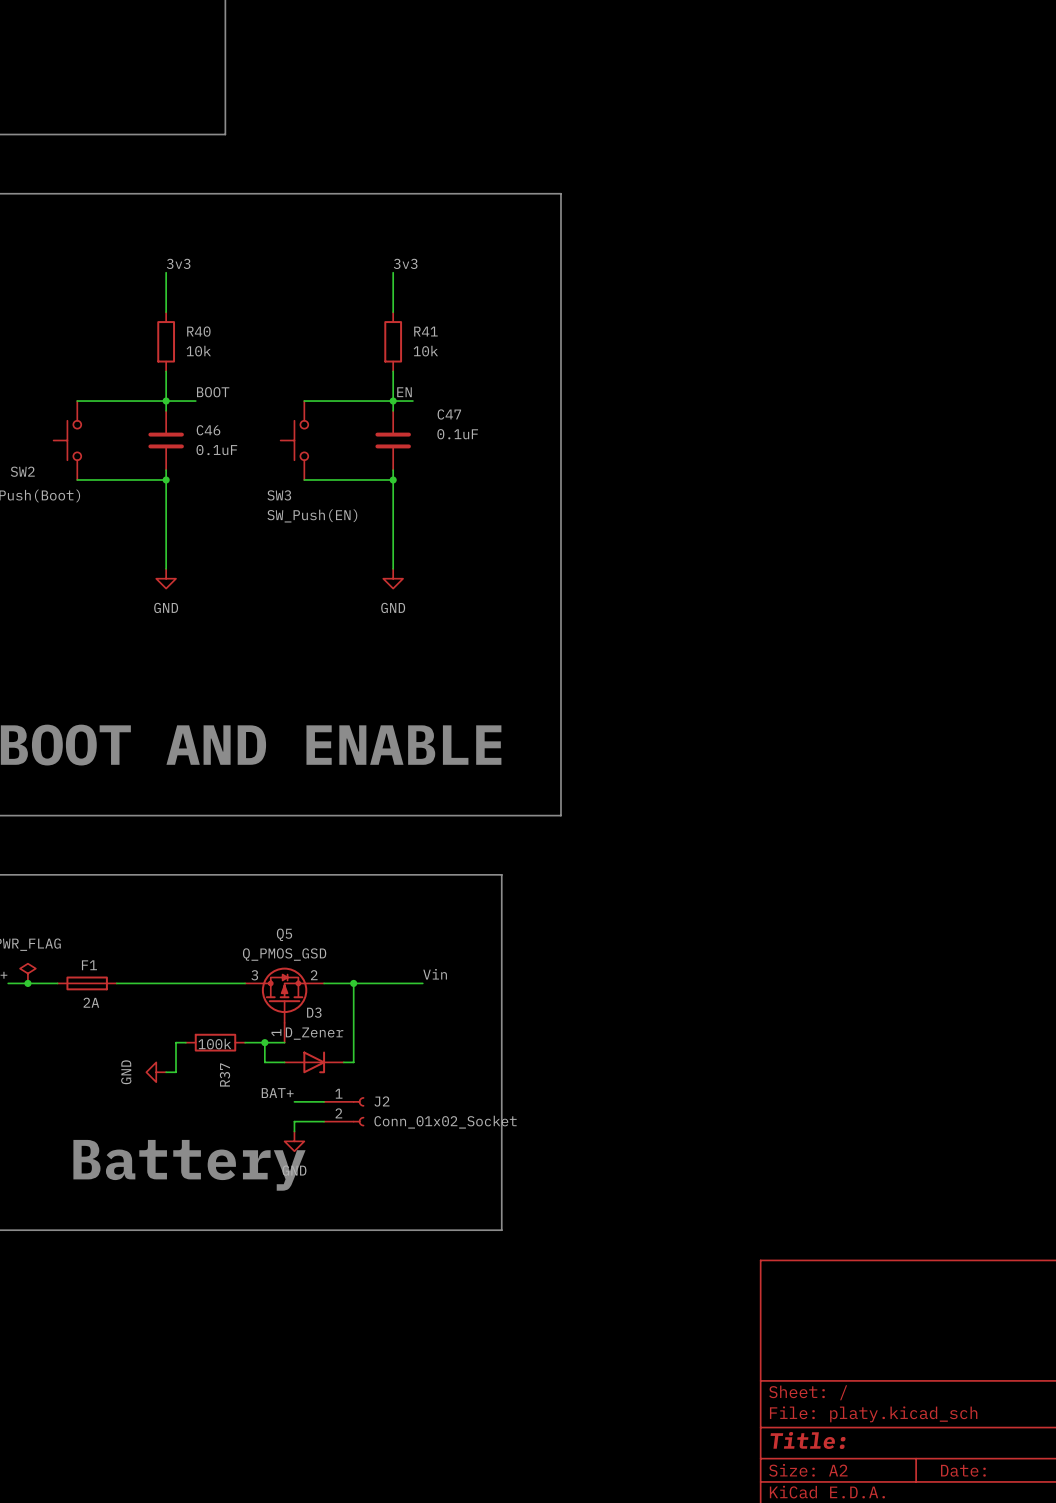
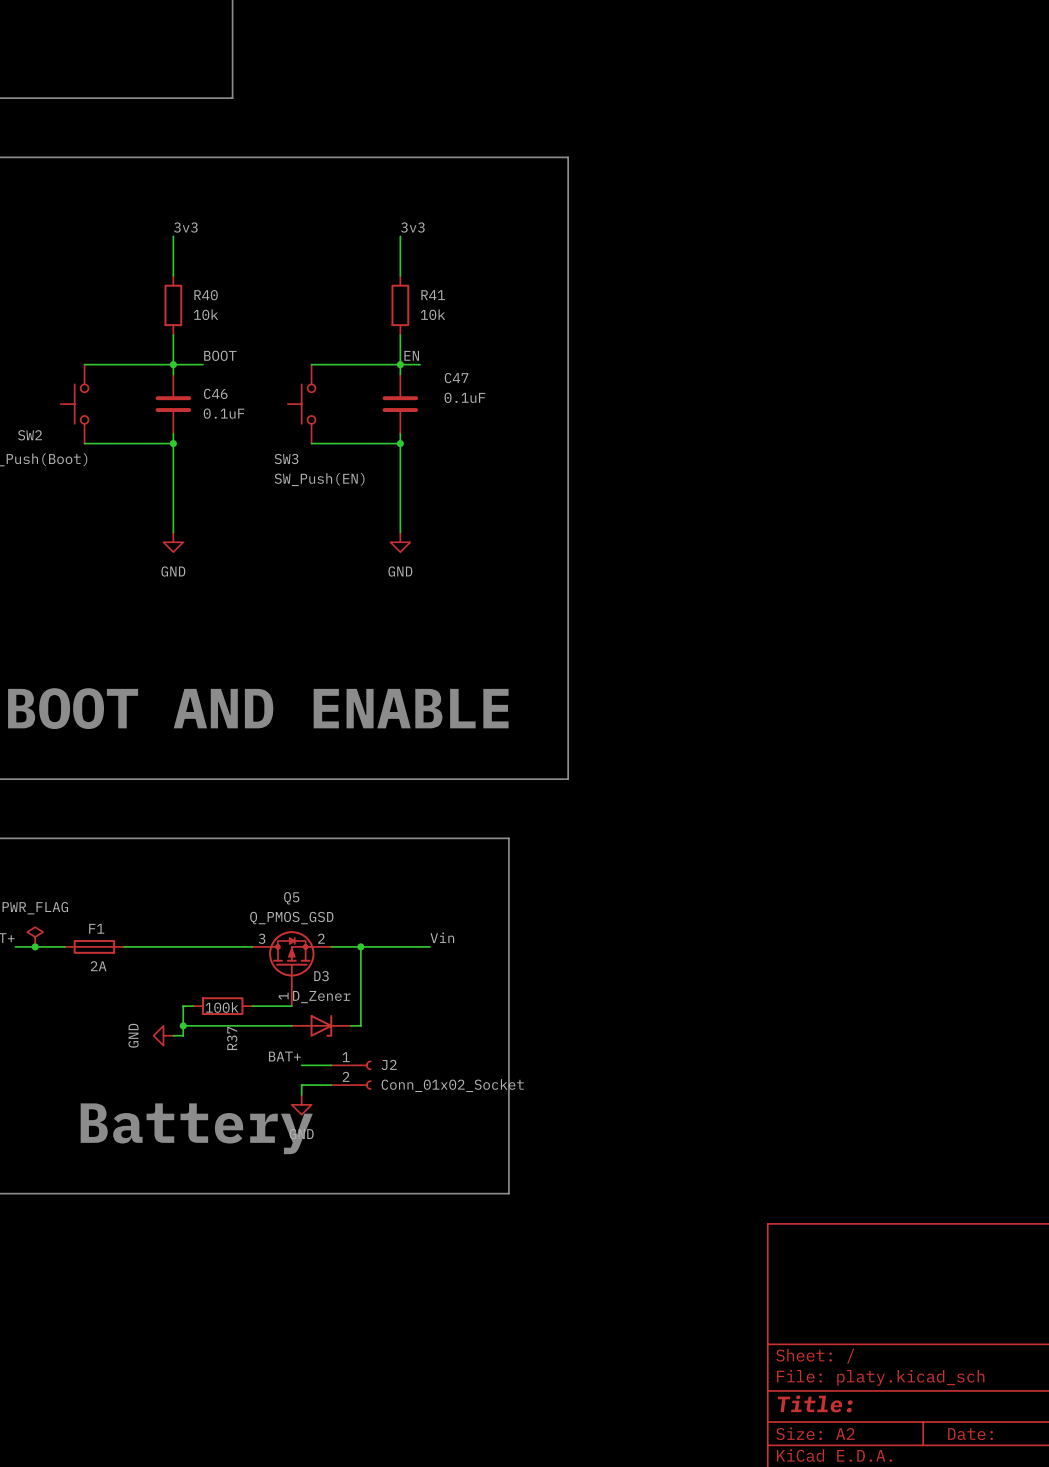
wire: (264, 1042) (264, 1062) -> (183, 1025) (272, 1025)
junction: (264, 1042) -> none
junction: none -> (183, 1025)

